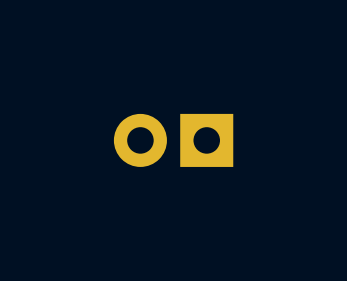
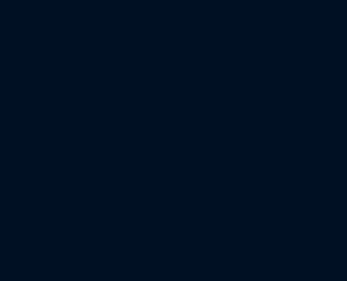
part: (173, 140) -> none

